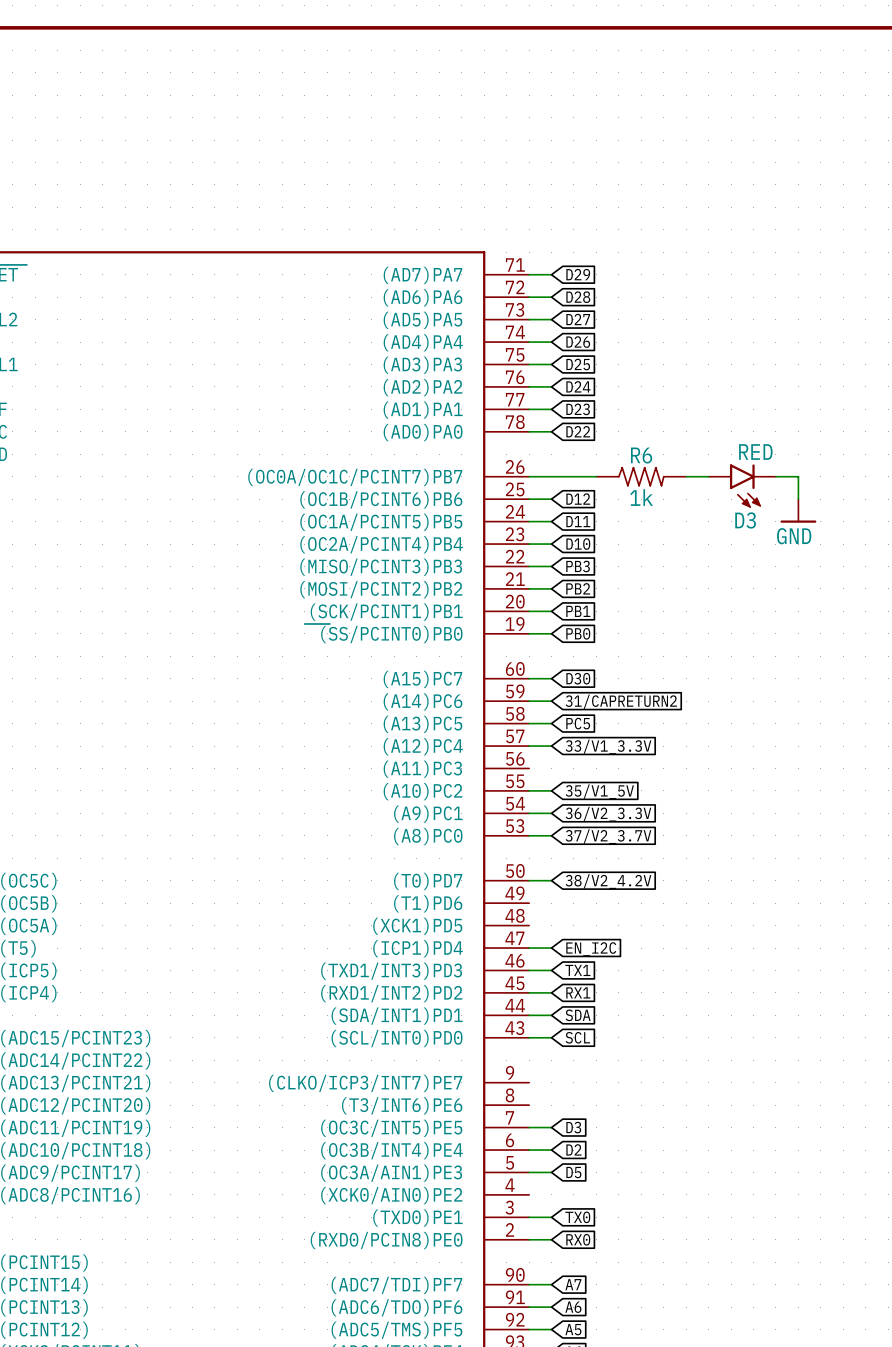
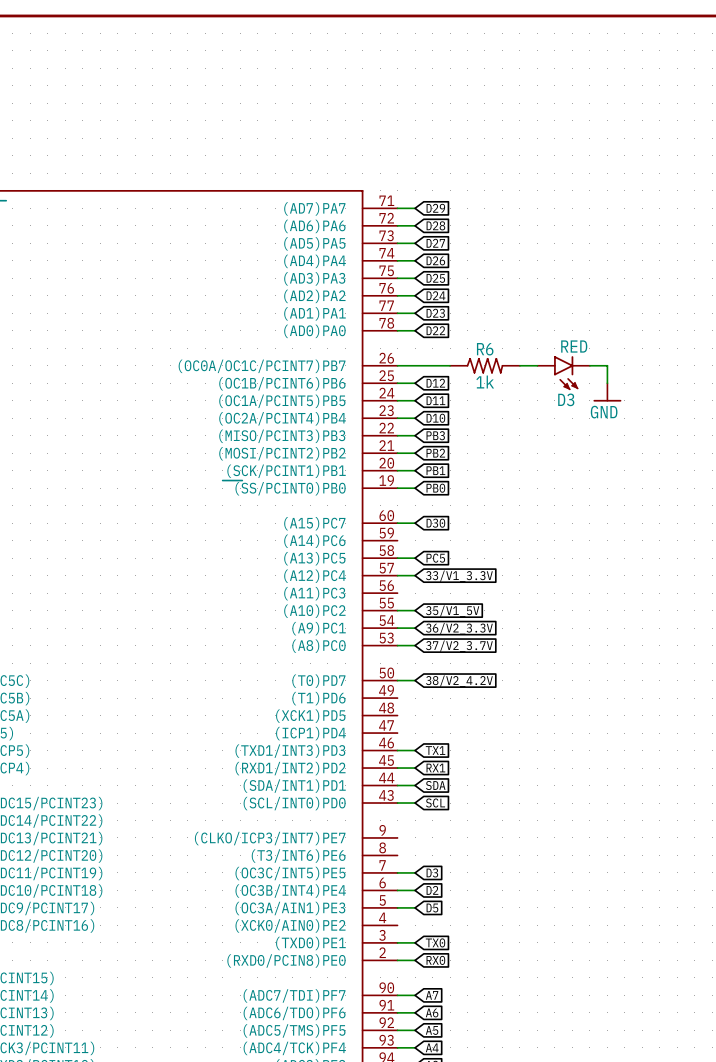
wire: (529, 701) (551, 701) -> none
global label: 31/CAPRETURN2 (621, 701) -> none
wire: (529, 948) (551, 948) -> none
global label: EN_I2C (591, 949) -> none

